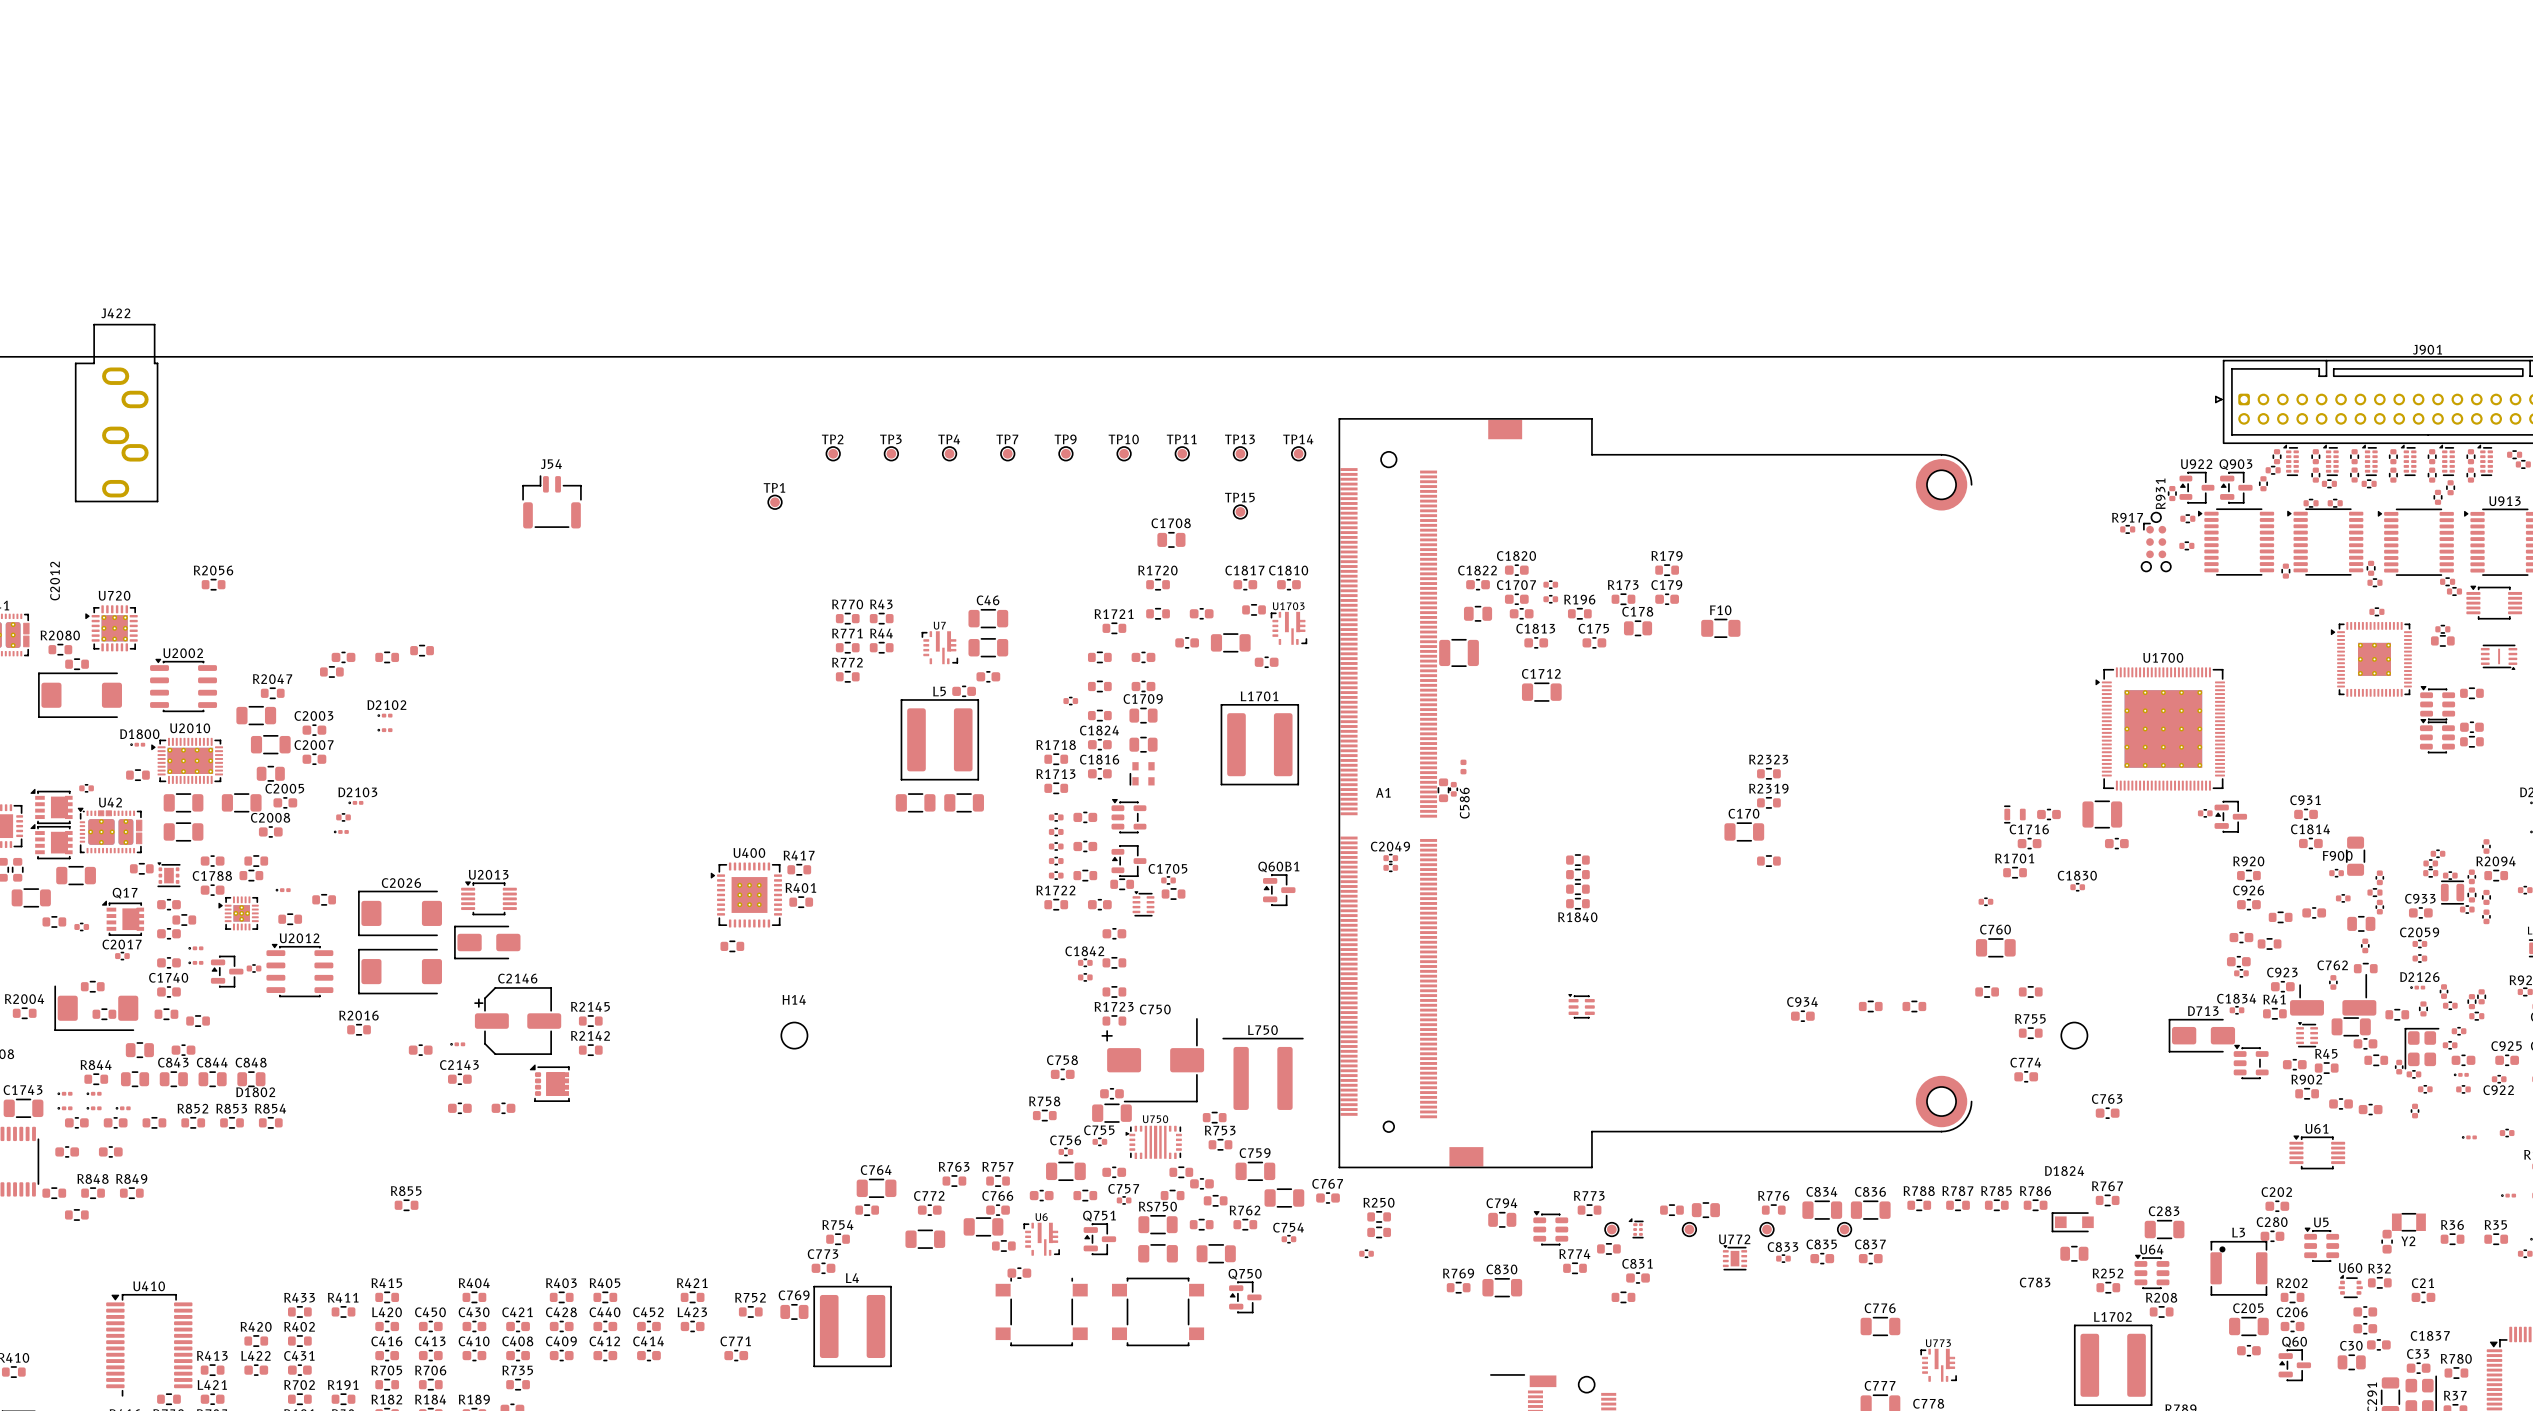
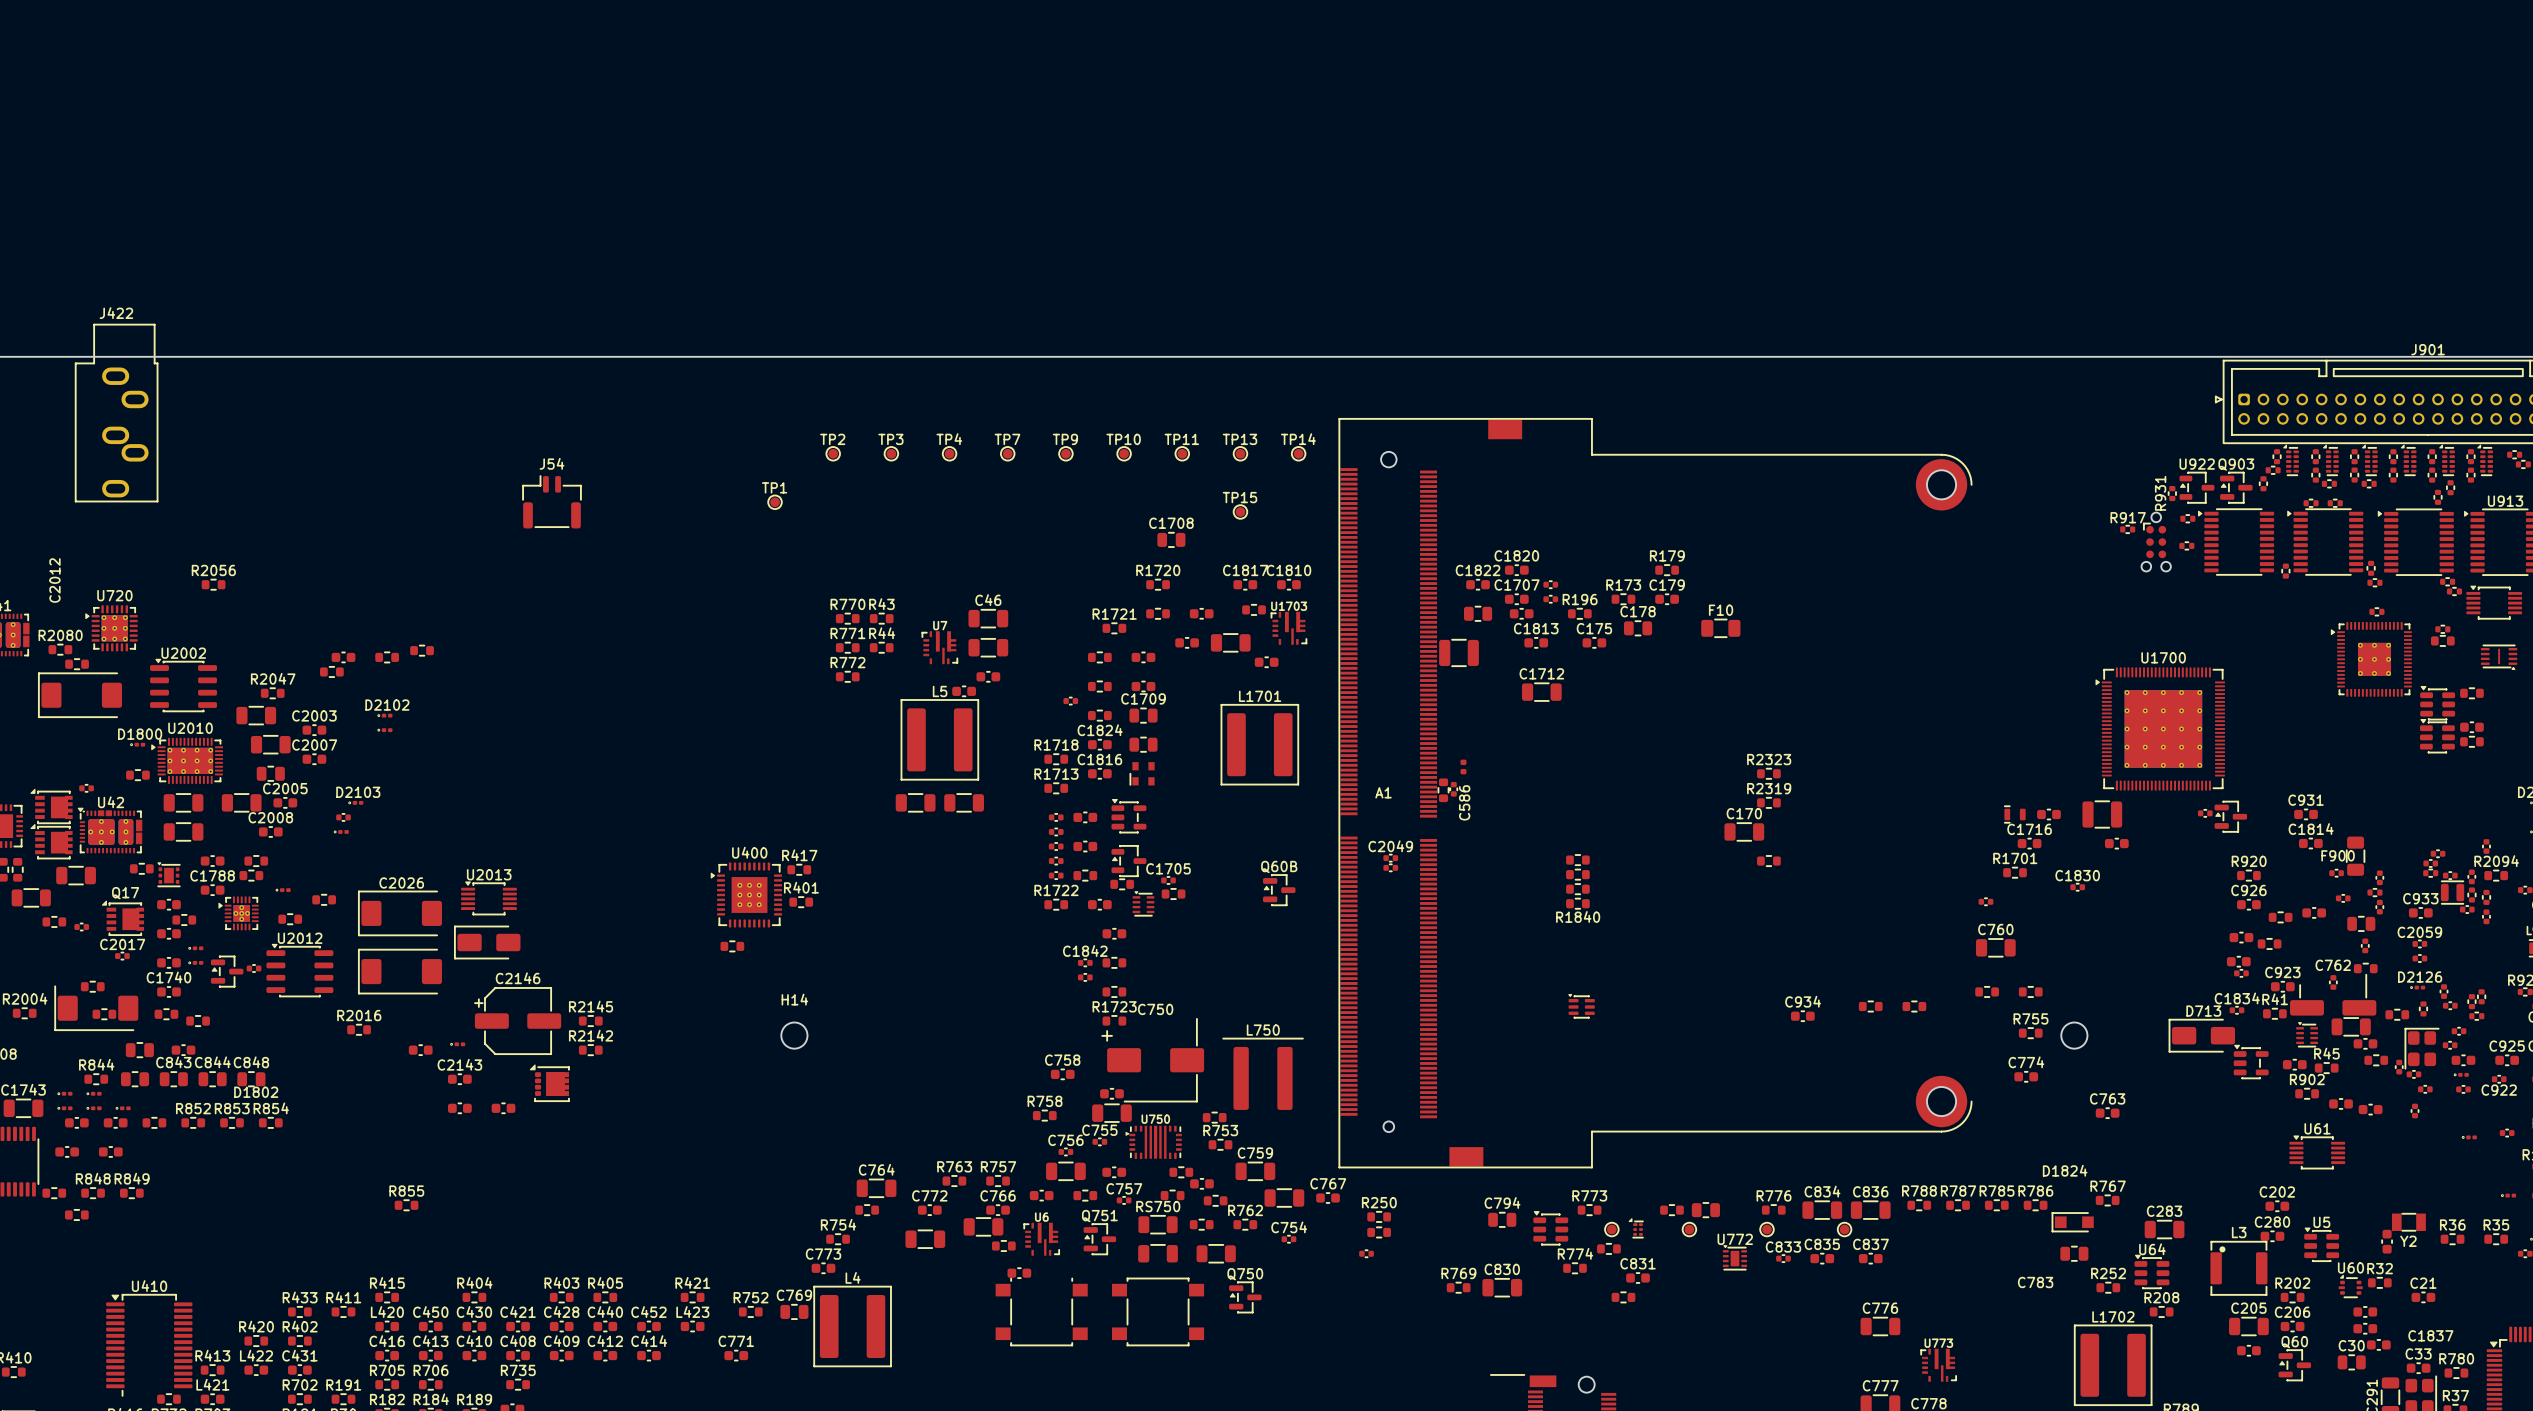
Q60B1 name: Q60B1 (1278, 866) -> Q60B (1279, 866)

